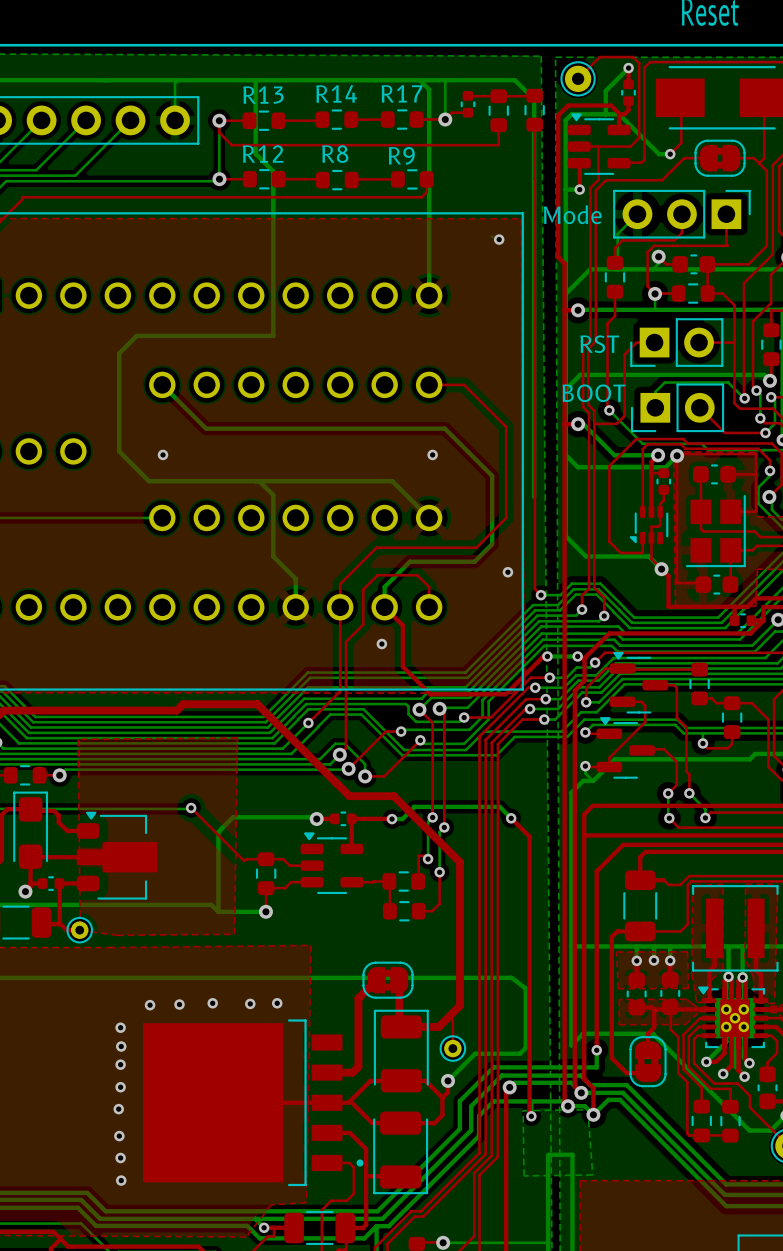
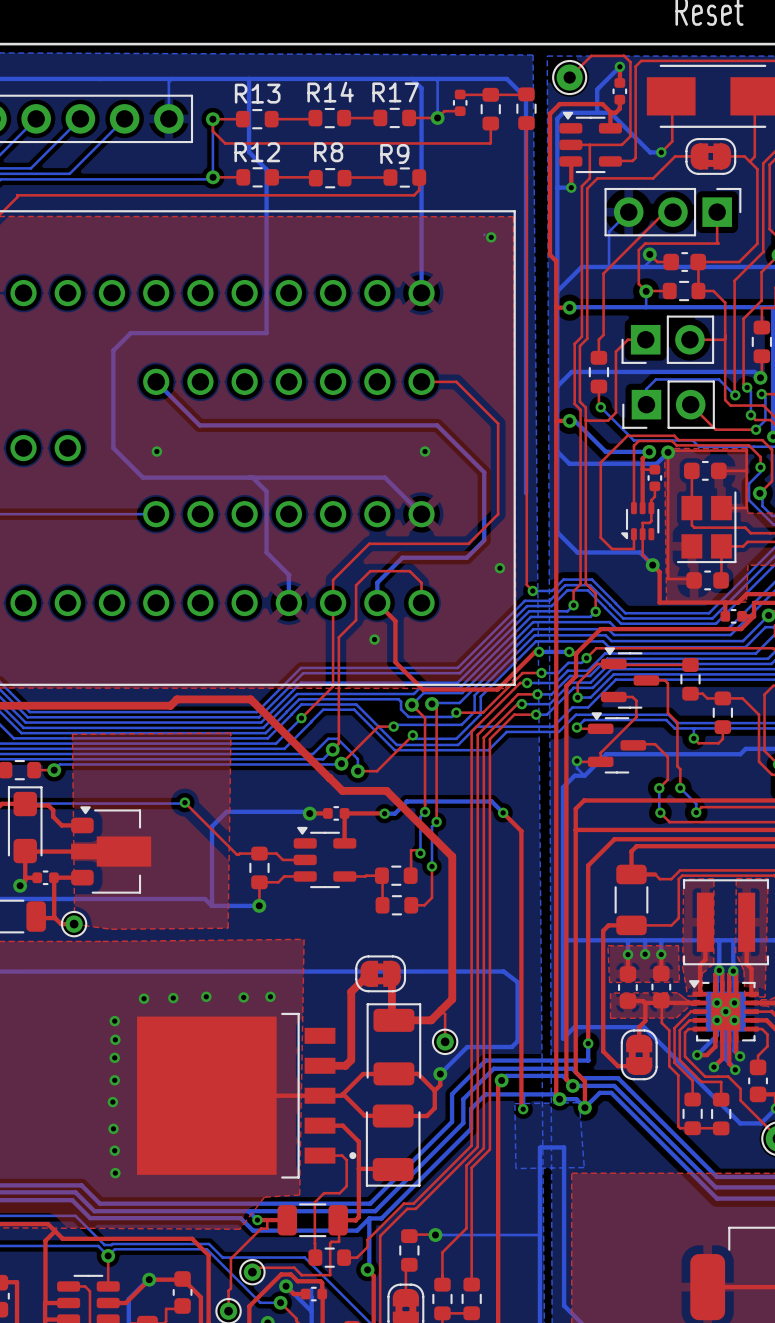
text: Mode (572, 214) -> none
top track: (681, 214) (681, 233) (674, 240) (622, 240) (614, 248) (614, 262) -> none
part position: (614, 277) -> (598, 372)
top track: (614, 291) (614, 316) (607, 323) (607, 342) -> (664, 212) (603, 273) (603, 334) (598, 339)
text: RST (599, 344) -> none
text: BOOT (593, 393) -> none

